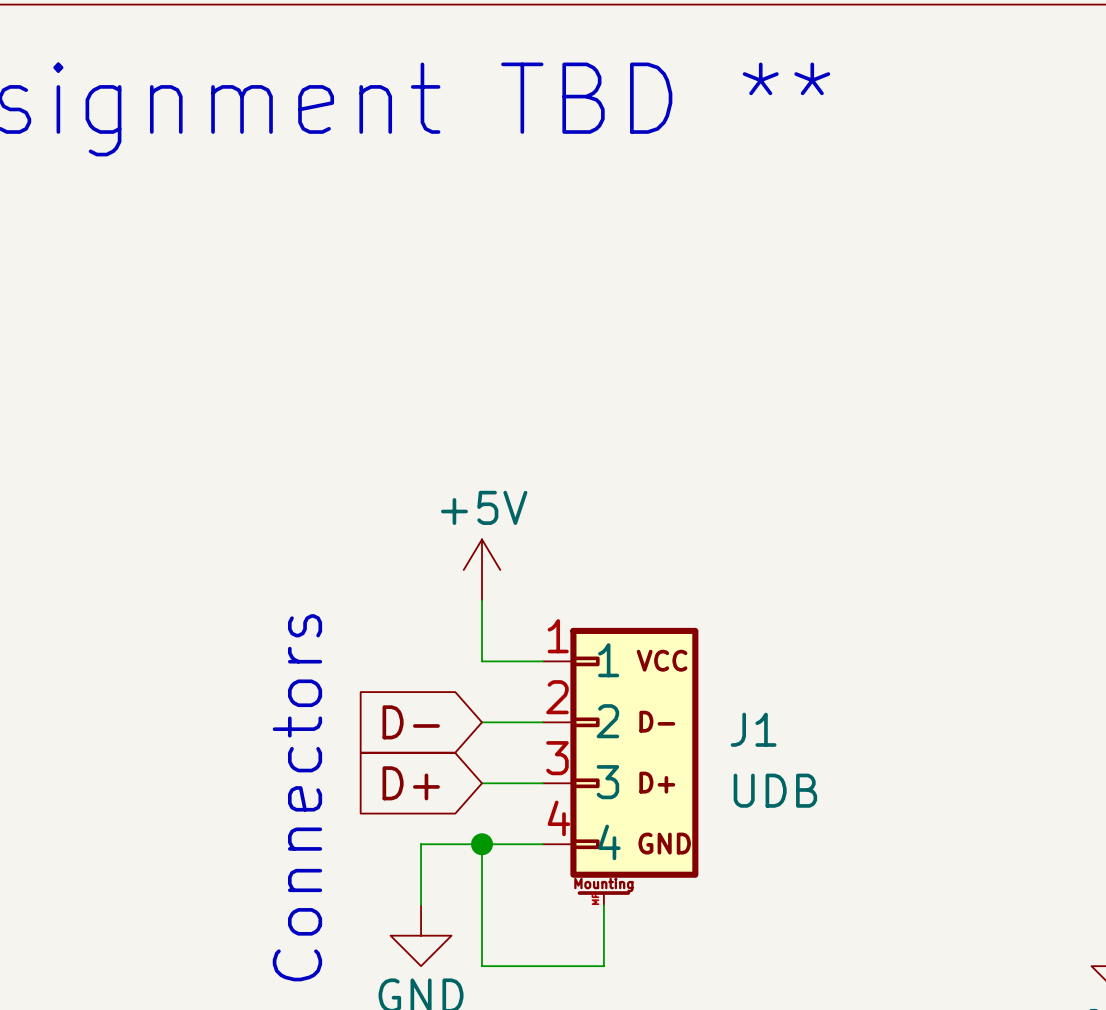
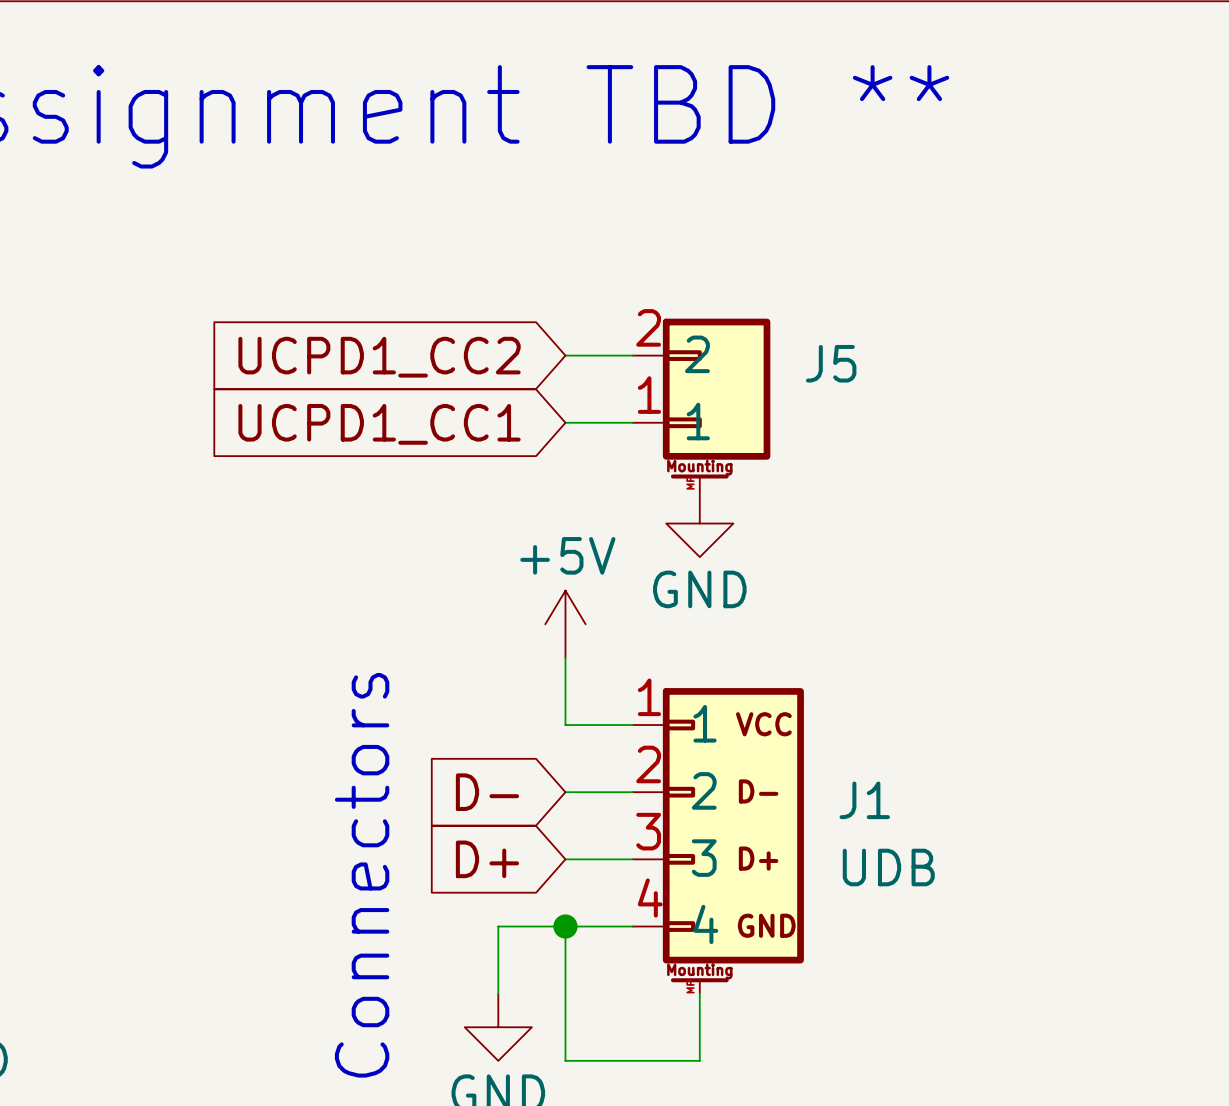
wire: none -> (565, 355) (632, 355)
global label: none -> UCPD1_CC2 (379, 357)
J5: none -> (701, 404)
wire: none -> (565, 422) (632, 422)
global label: none -> UCPD1_CC1 (379, 424)
power symbol: none -> GND (699, 523)

